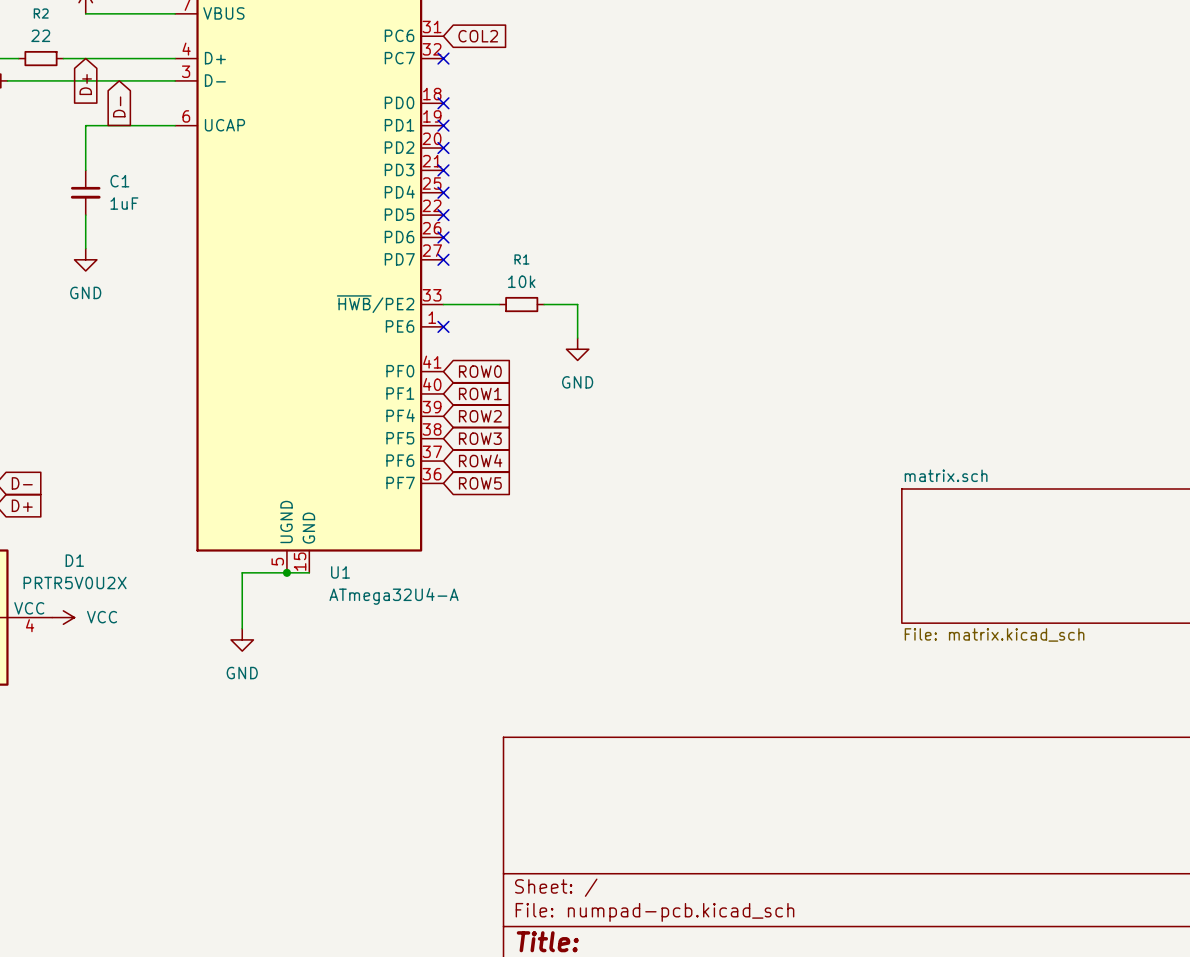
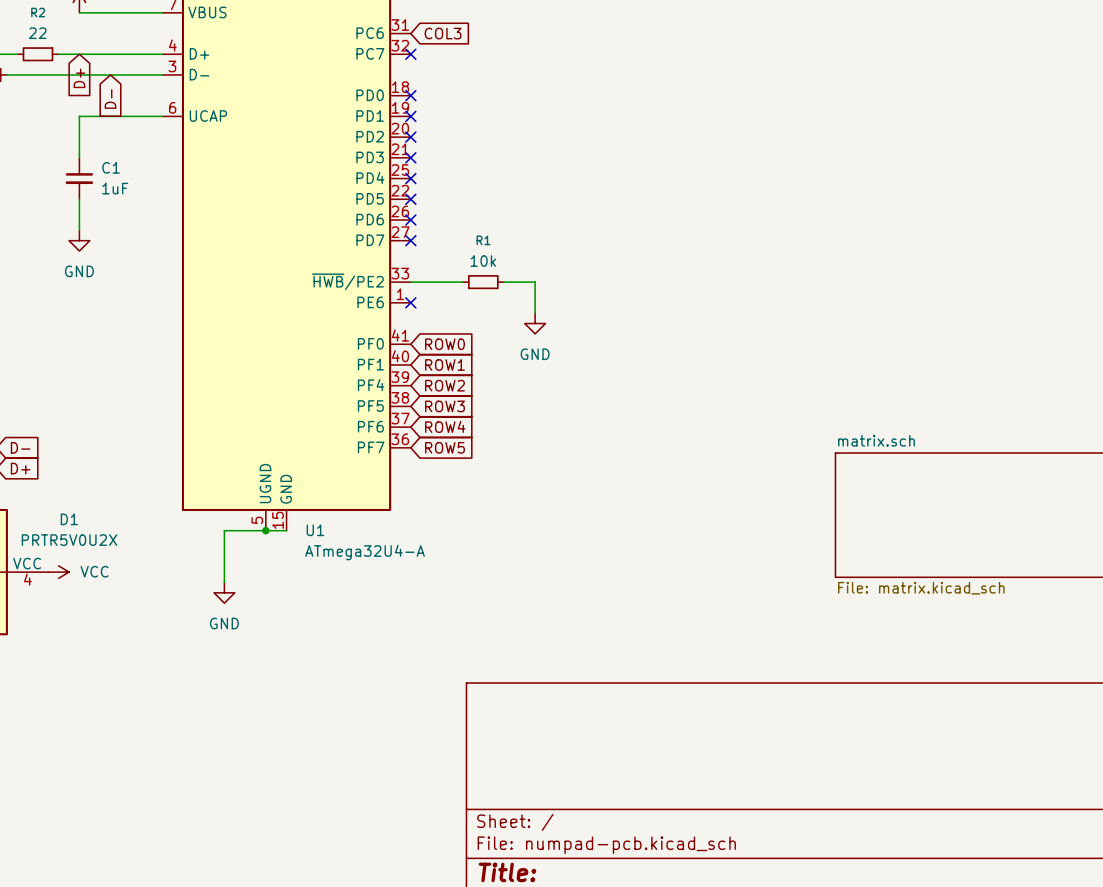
global label: COL2 (478, 36) -> COL3 (443, 33)

